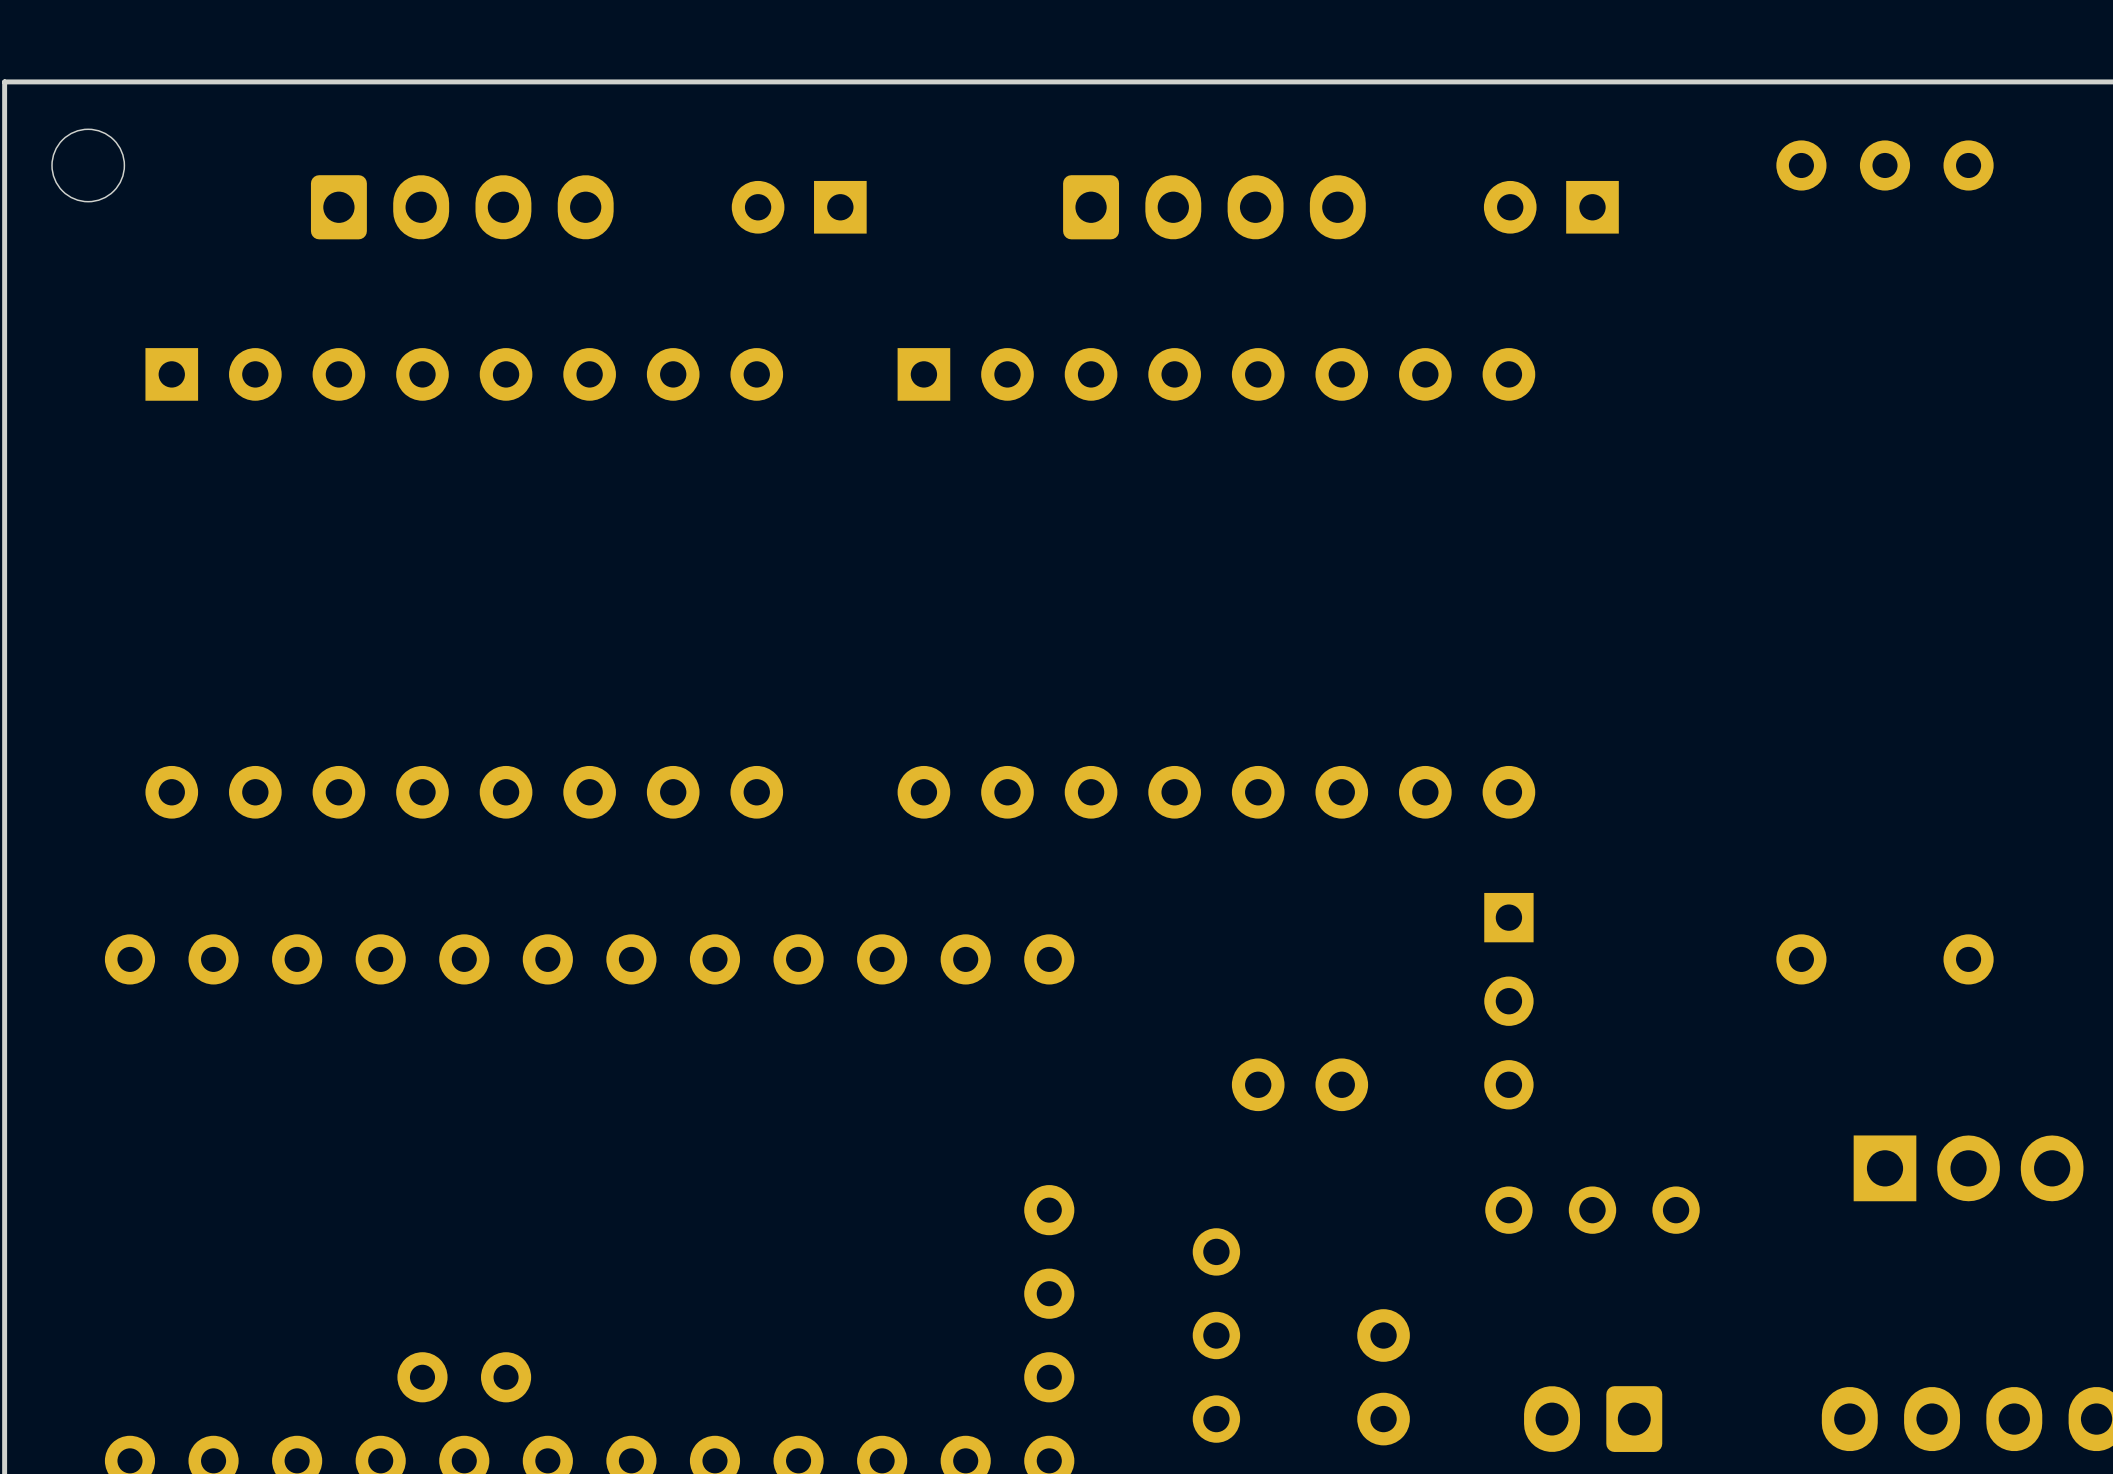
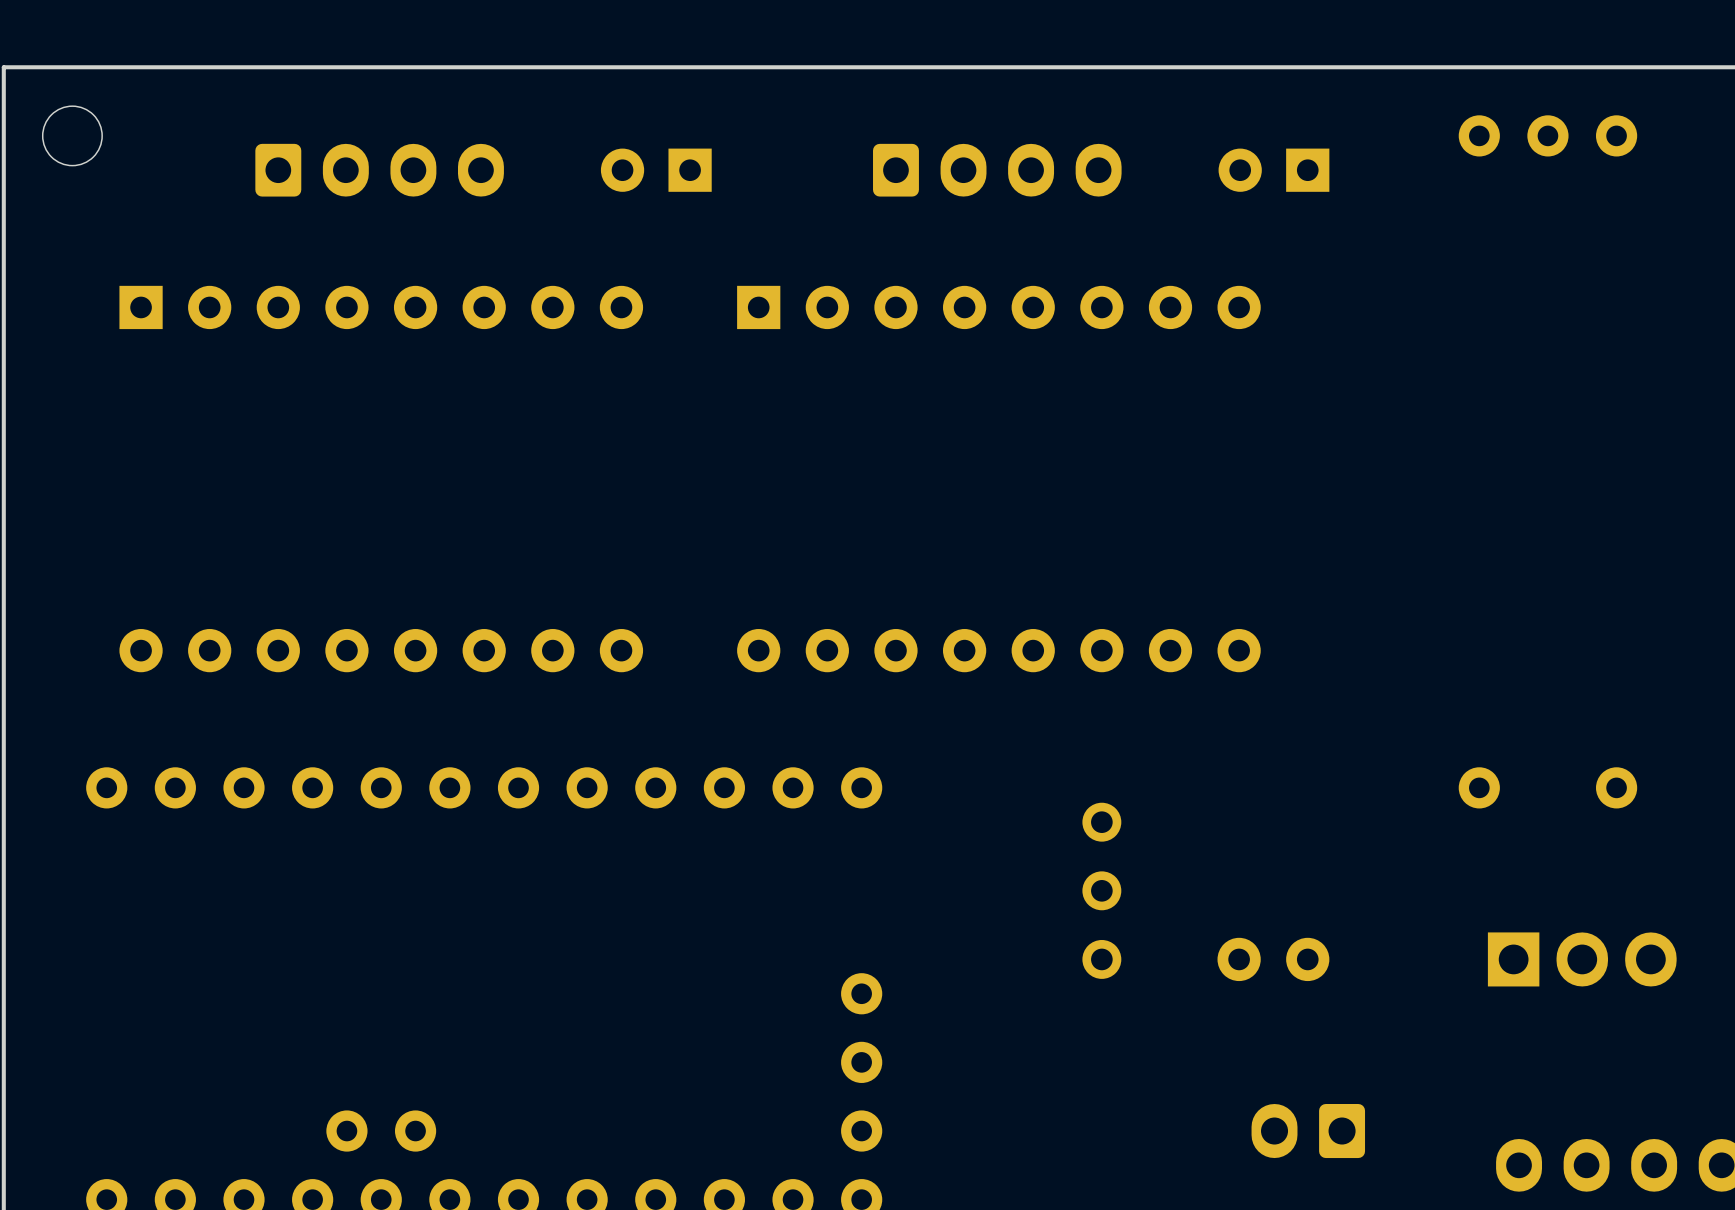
part: (1508, 1001) -> none
part: (1299, 1084) -> none
part: none -> (1101, 890)
part: none -> (1273, 959)
part position: (1968, 1168) -> (1582, 959)
part: (1592, 1210) -> none
part: (1216, 1335) -> none
part: (1383, 1377) -> none
part position: (1593, 1419) -> (1308, 1131)

